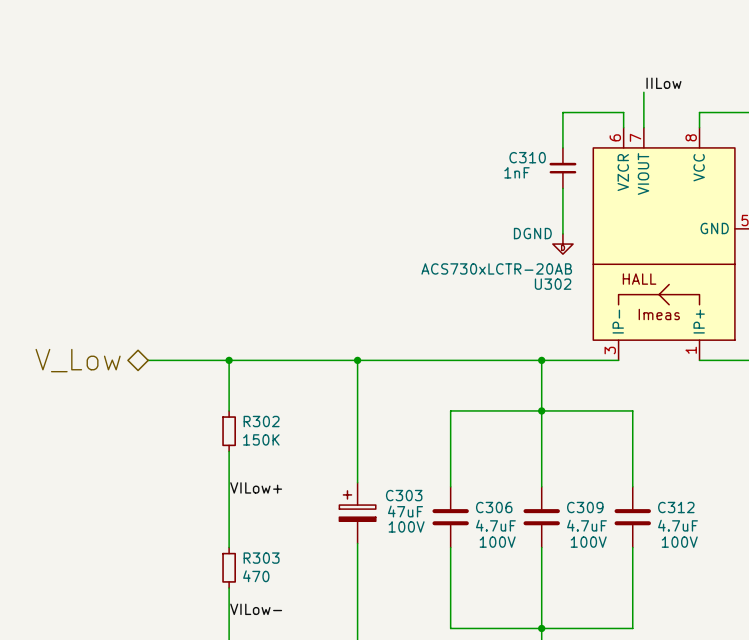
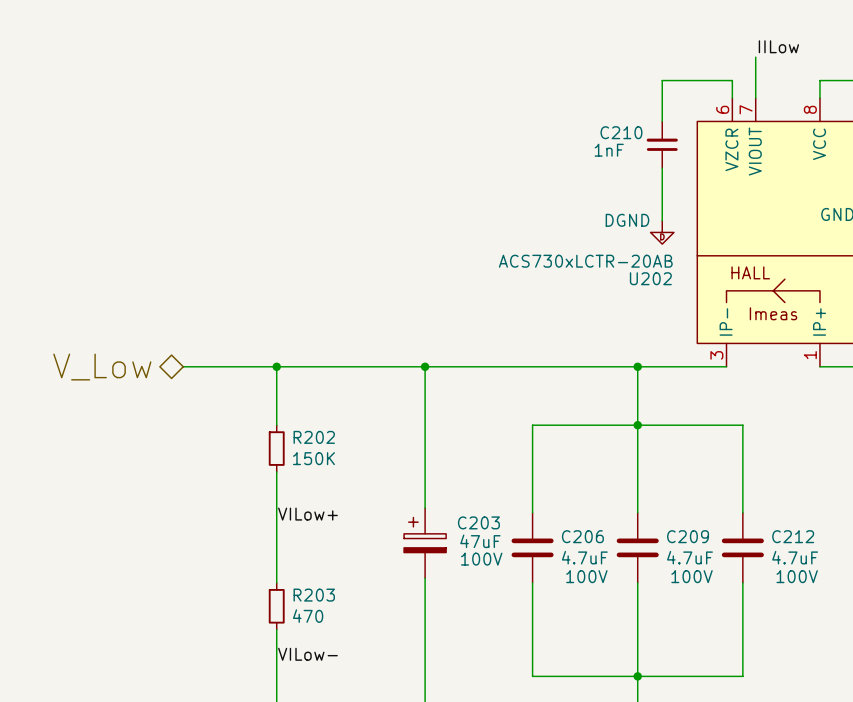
C310 name: C310 (527, 157) -> C210 (621, 132)
U302 name: U302 (553, 284) -> U202 (650, 278)
R302 name: R302 (261, 421) -> R202 (314, 437)
C303 name: C303 (404, 495) -> C203 (478, 522)
C306 name: C306 (494, 507) -> C206 (582, 536)
C309 name: C309 (585, 507) -> C209 (688, 536)
C312 name: C312 (676, 507) -> C212 (793, 536)
R303 name: R303 (261, 558) -> R203 (314, 595)

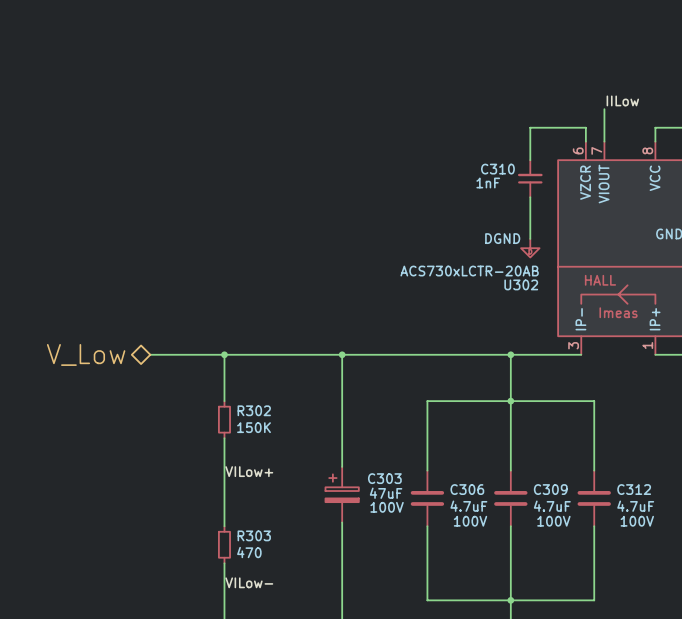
C210 name: C210 (621, 132) -> C310 (497, 169)
U202 name: U202 (650, 278) -> U302 (521, 284)
R202 name: R202 (314, 437) -> R302 (254, 410)
C203 name: C203 (478, 522) -> C303 (384, 478)
C206 name: C206 (582, 536) -> C306 (467, 489)
C209 name: C209 (688, 536) -> C309 (550, 489)
C212 name: C212 (793, 536) -> C312 (634, 489)
R203 name: R203 (314, 595) -> R303 (254, 535)

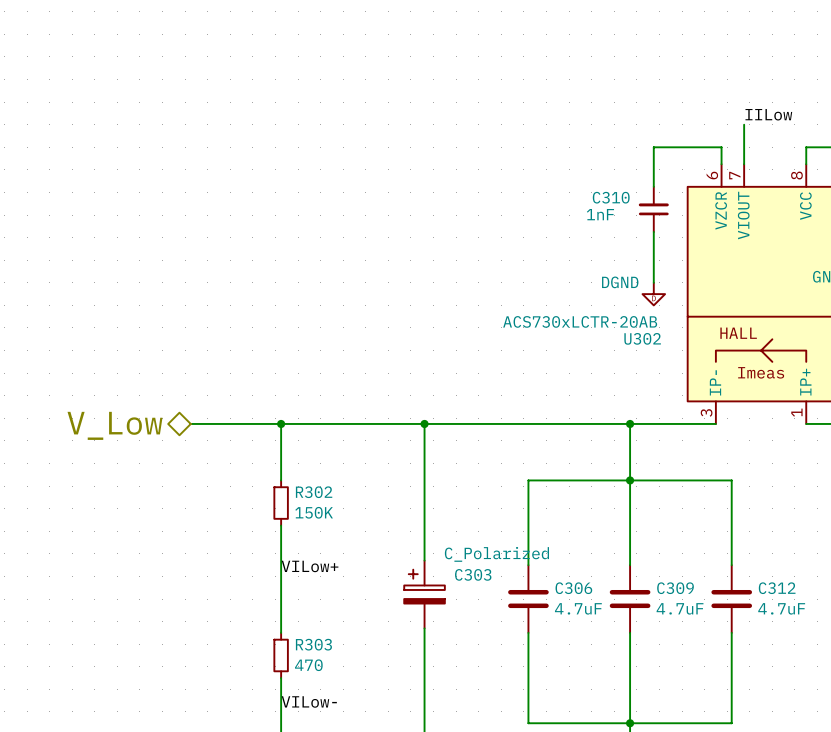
C303 value: 47uF (386, 493) -> C_Polarized (496, 554)
C303 text: 100V (387, 507) -> none
C306 text: 100V (470, 521) -> none
C309 text: 100V (553, 521) -> none
C312 text: 100V (637, 521) -> none

